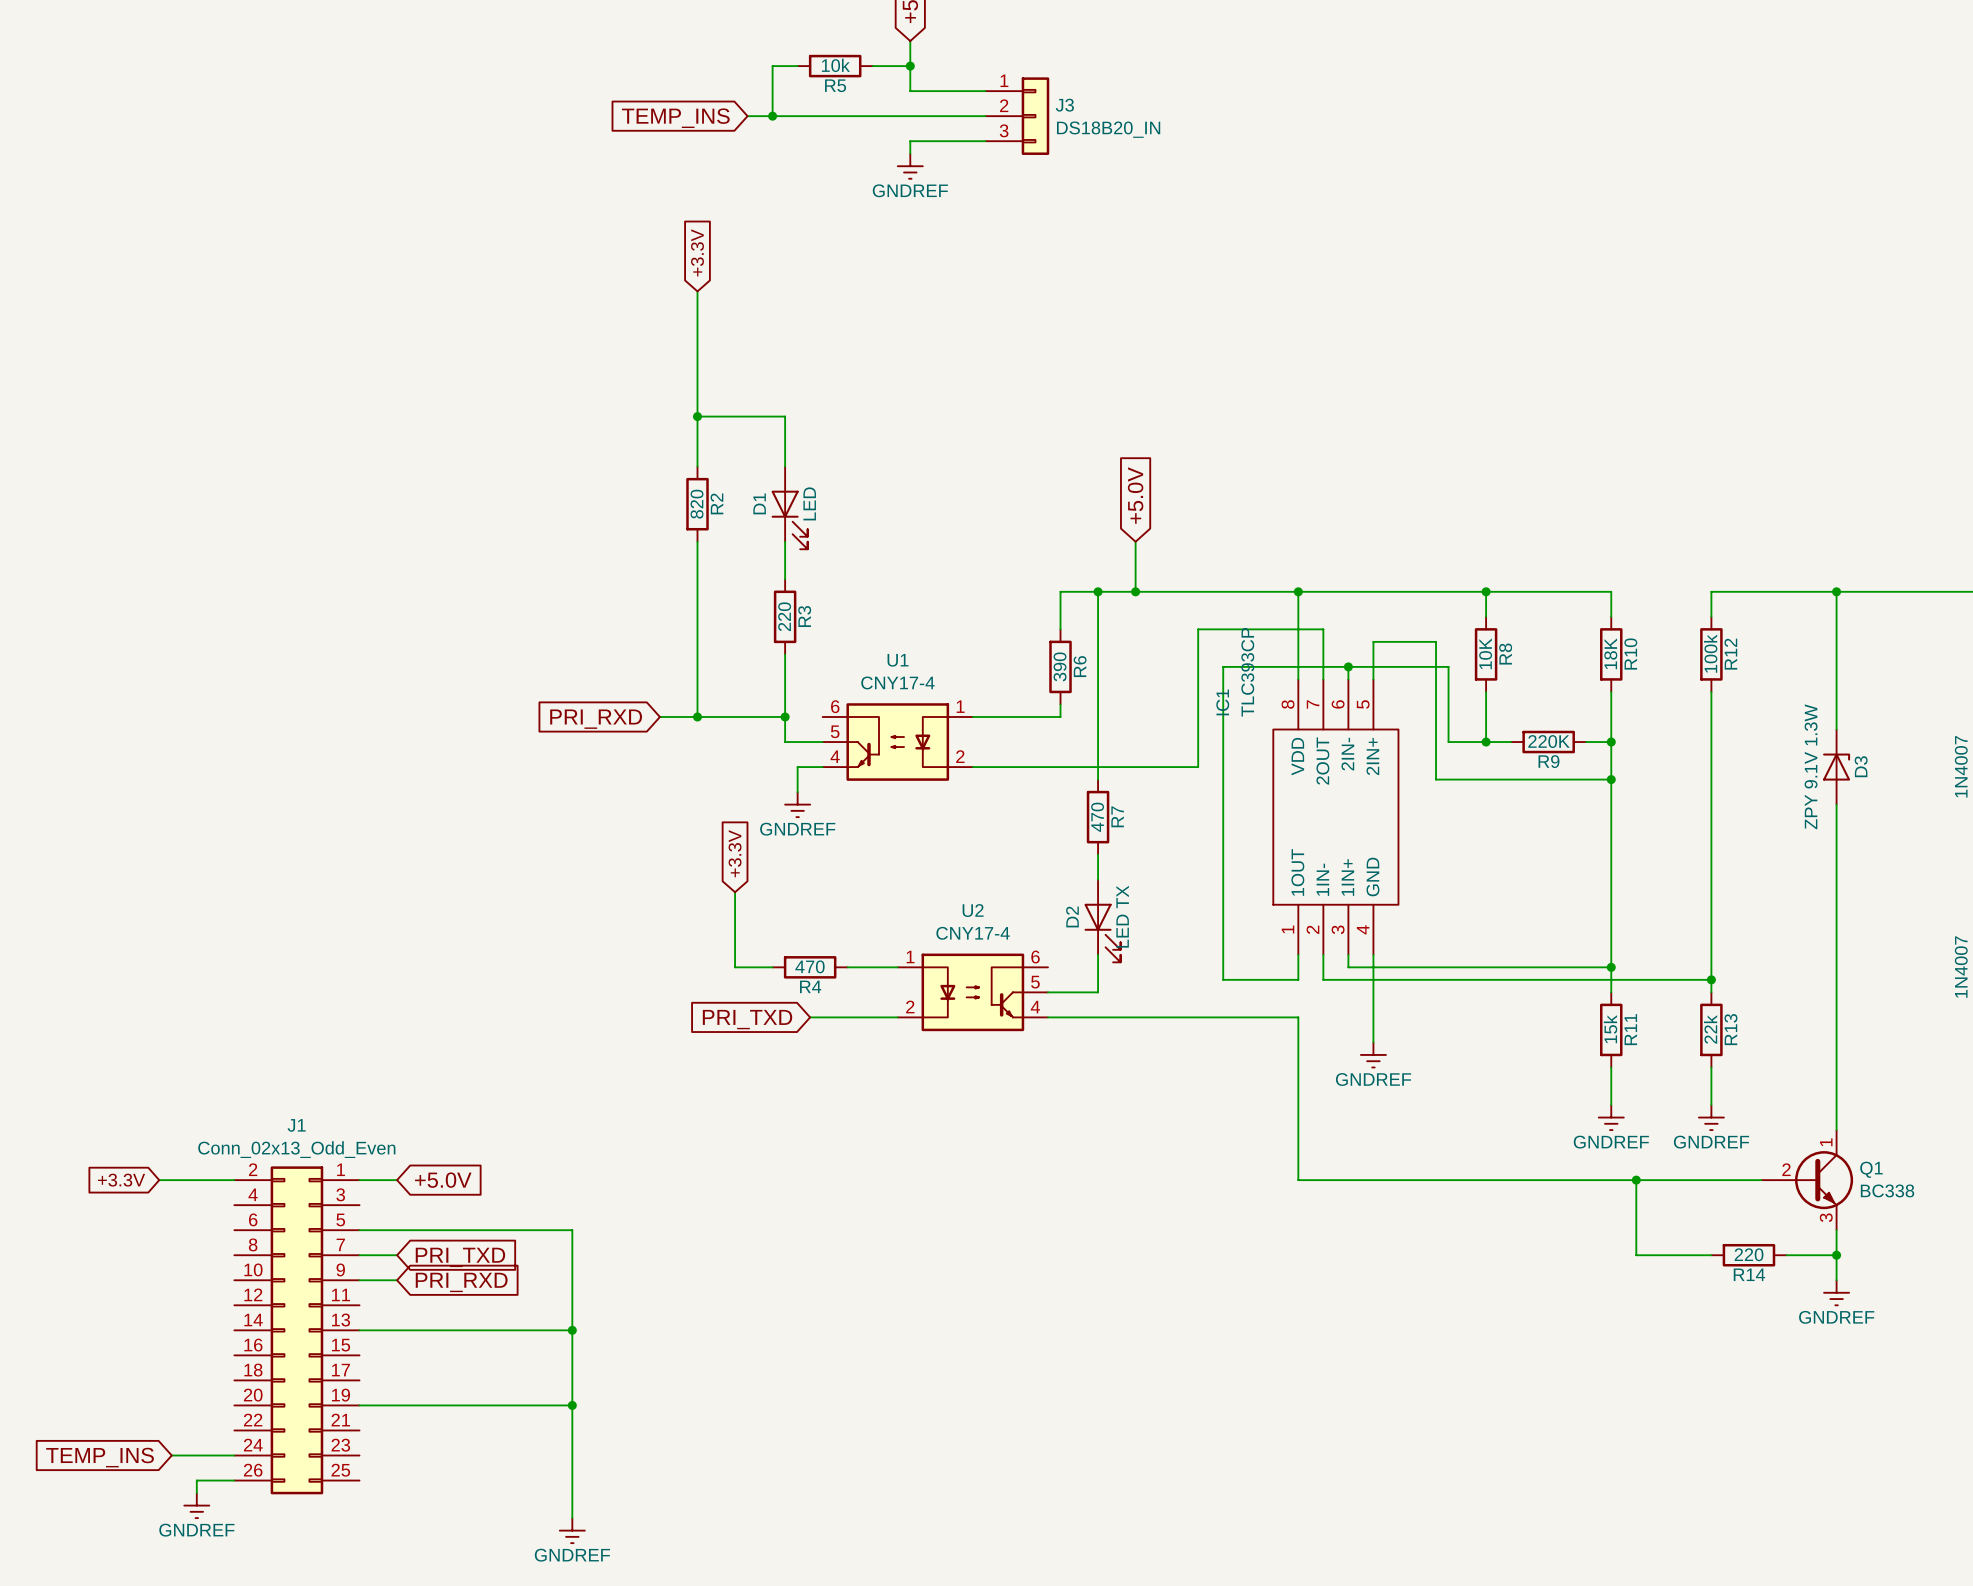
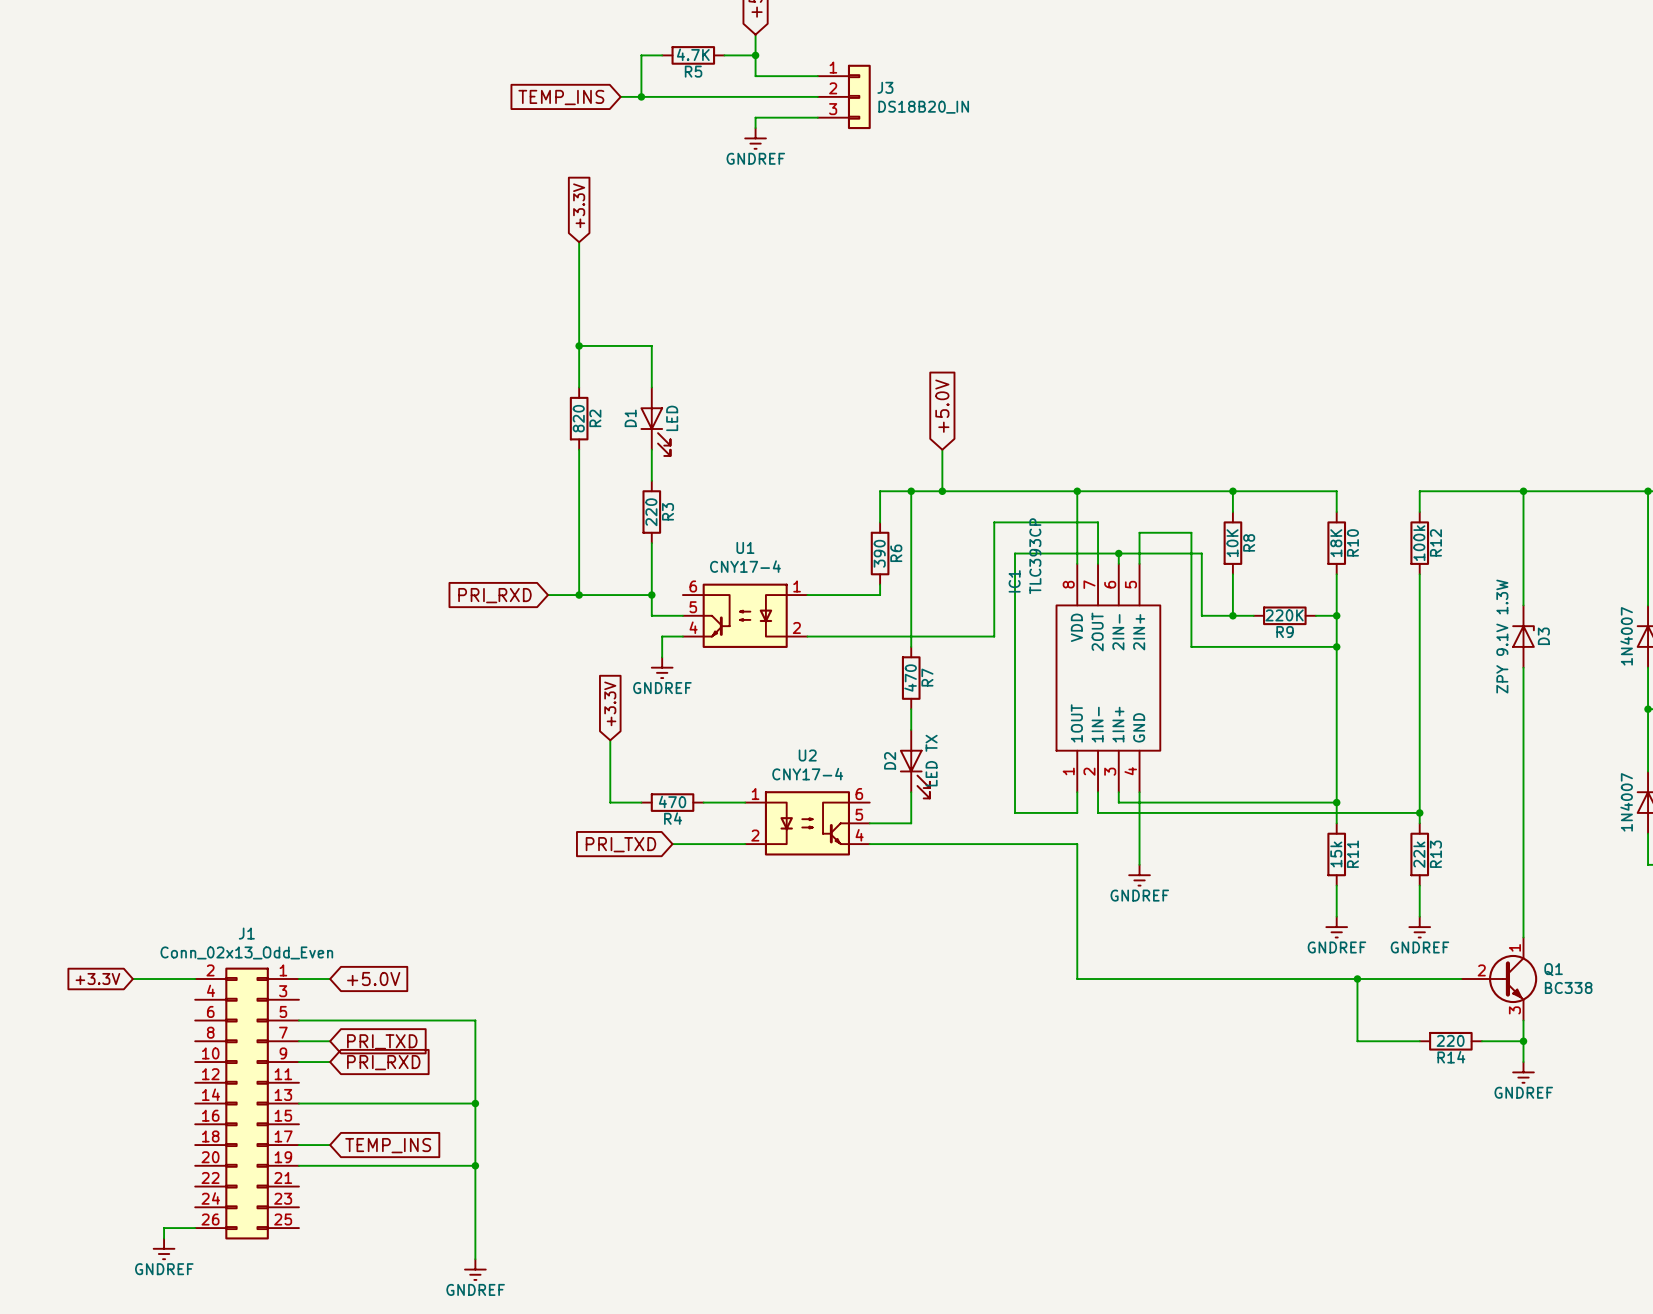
R5 value: 10k (835, 65) -> 4.7K (693, 54)
wire: none -> (298, 1145) (330, 1145)
wire: (171, 1455) (234, 1455) -> none
global label rotation: 0° (100, 1457) -> 180° (388, 1145)
global label position: TEMP_INS (100, 1457) -> TEMP_INS (388, 1145)

